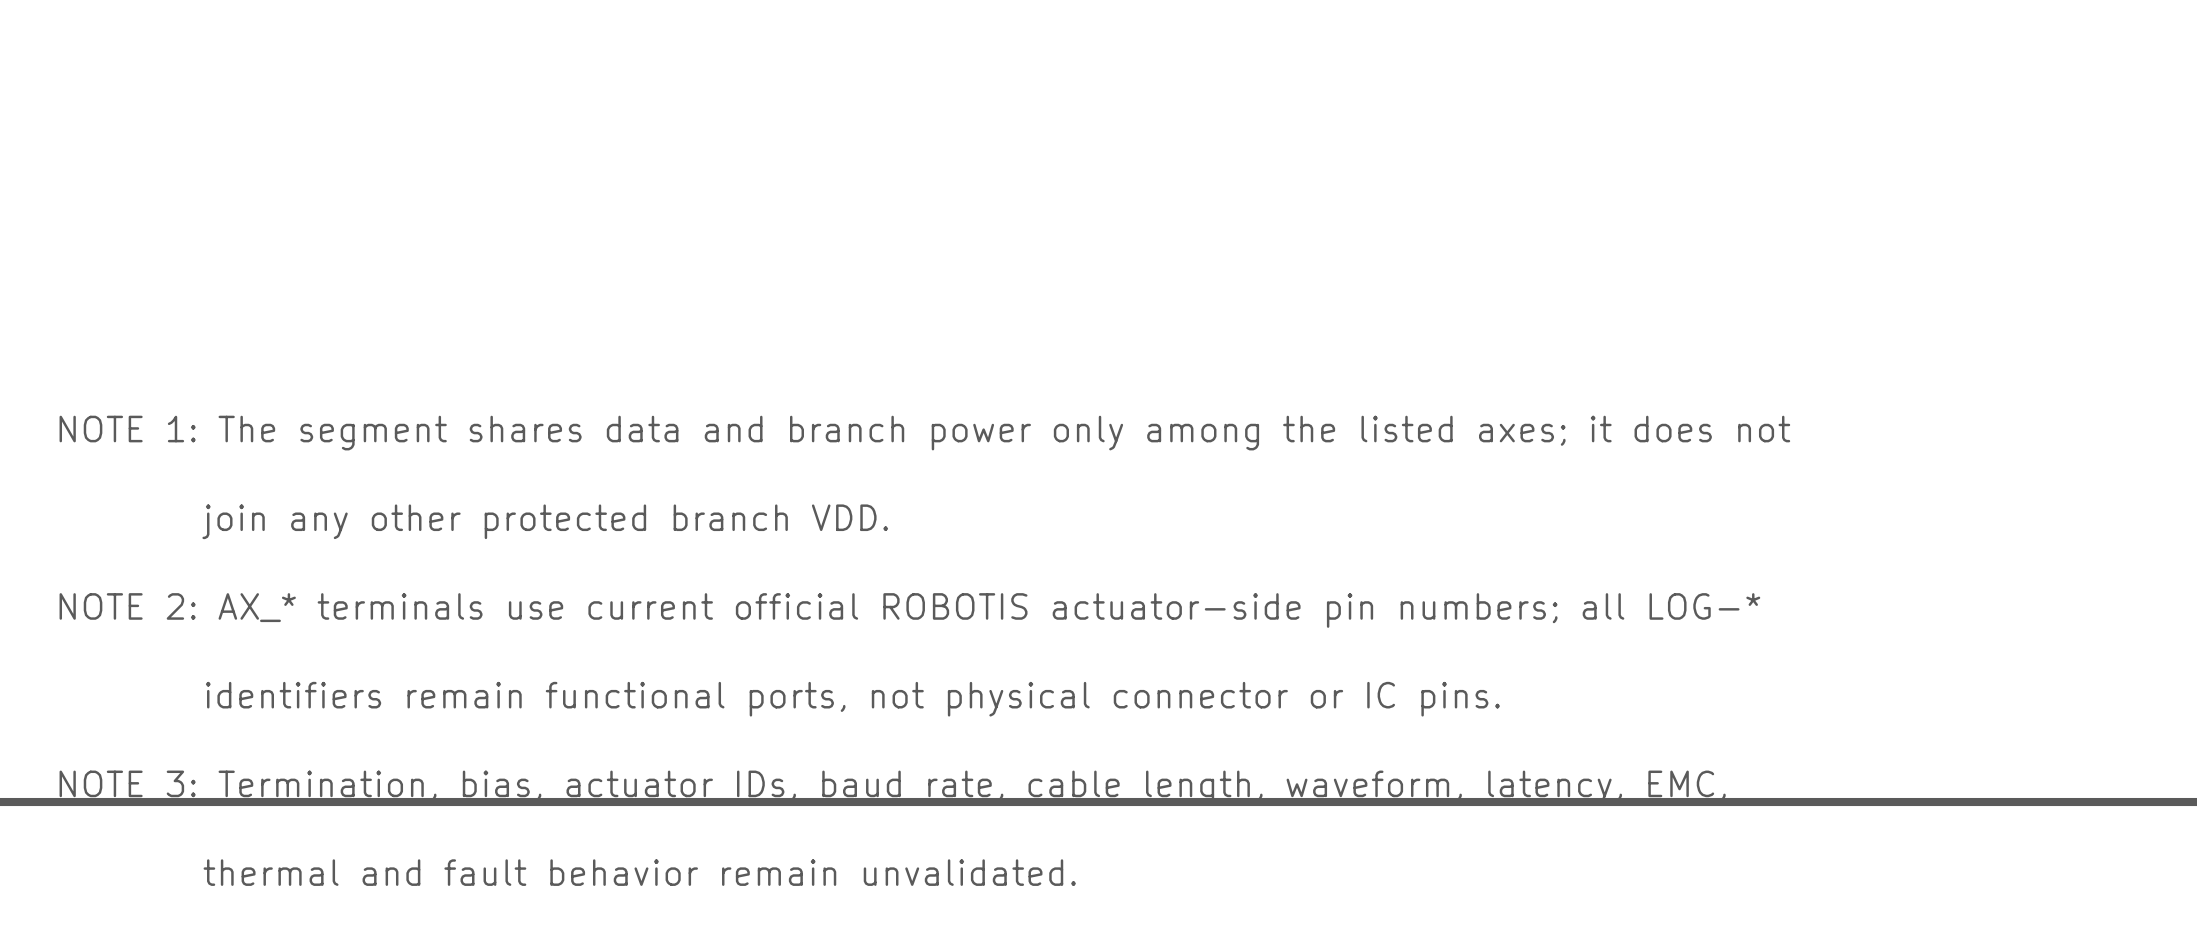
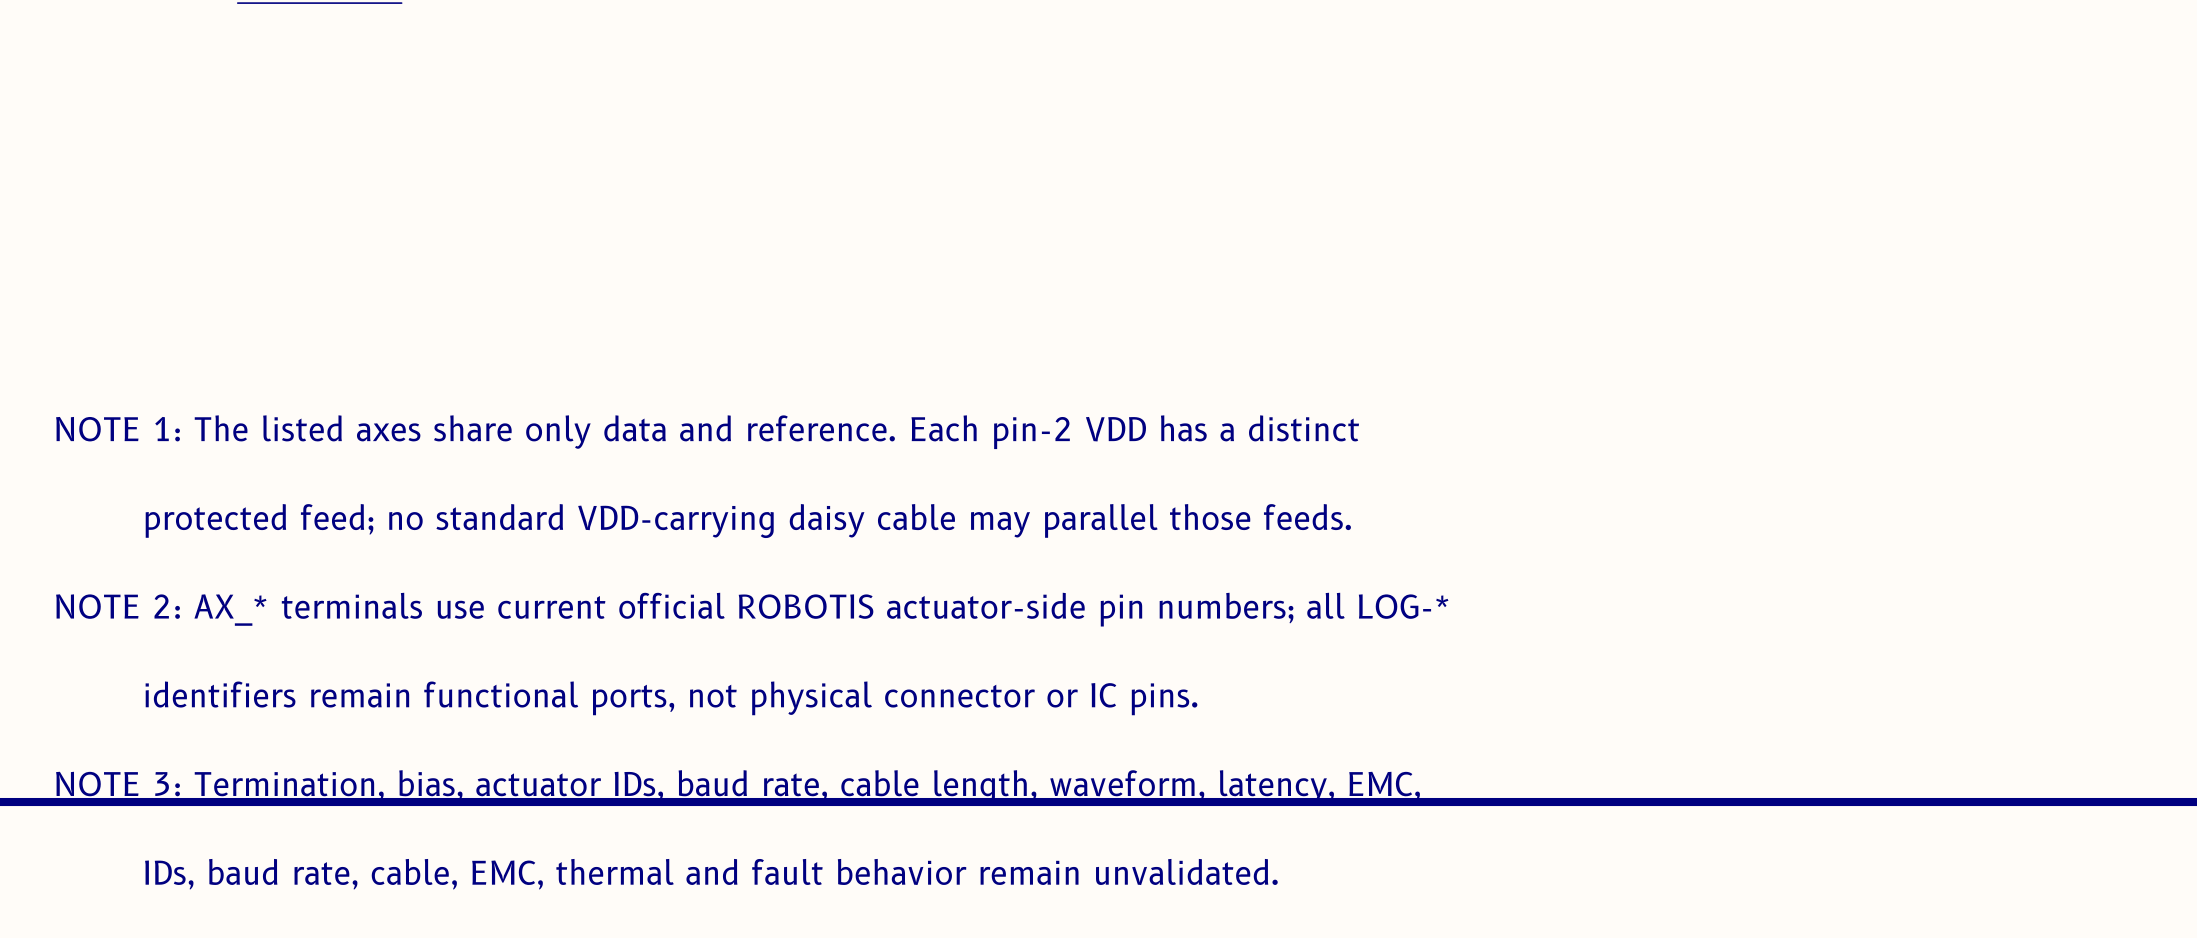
wire: none -> (237, 3) (401, 3)
text: NOTE 1: The segment shares data and branch power only among the listed axes; it does not (924, 433) -> NOTE 1: The listed axes share only data and reference. Each pin-2 VDD has a distinct (707, 432)
text: join any other protected branch VDD. (545, 521) -> protected feed; no standard VDD-carrying daisy cable may parallel those feeds. (748, 521)
text: thermal and fault behavior remain unvalidated. (639, 872) -> IDs, baud rate, cable, EMC, thermal and fault behavior remain unvalidated. (711, 874)

